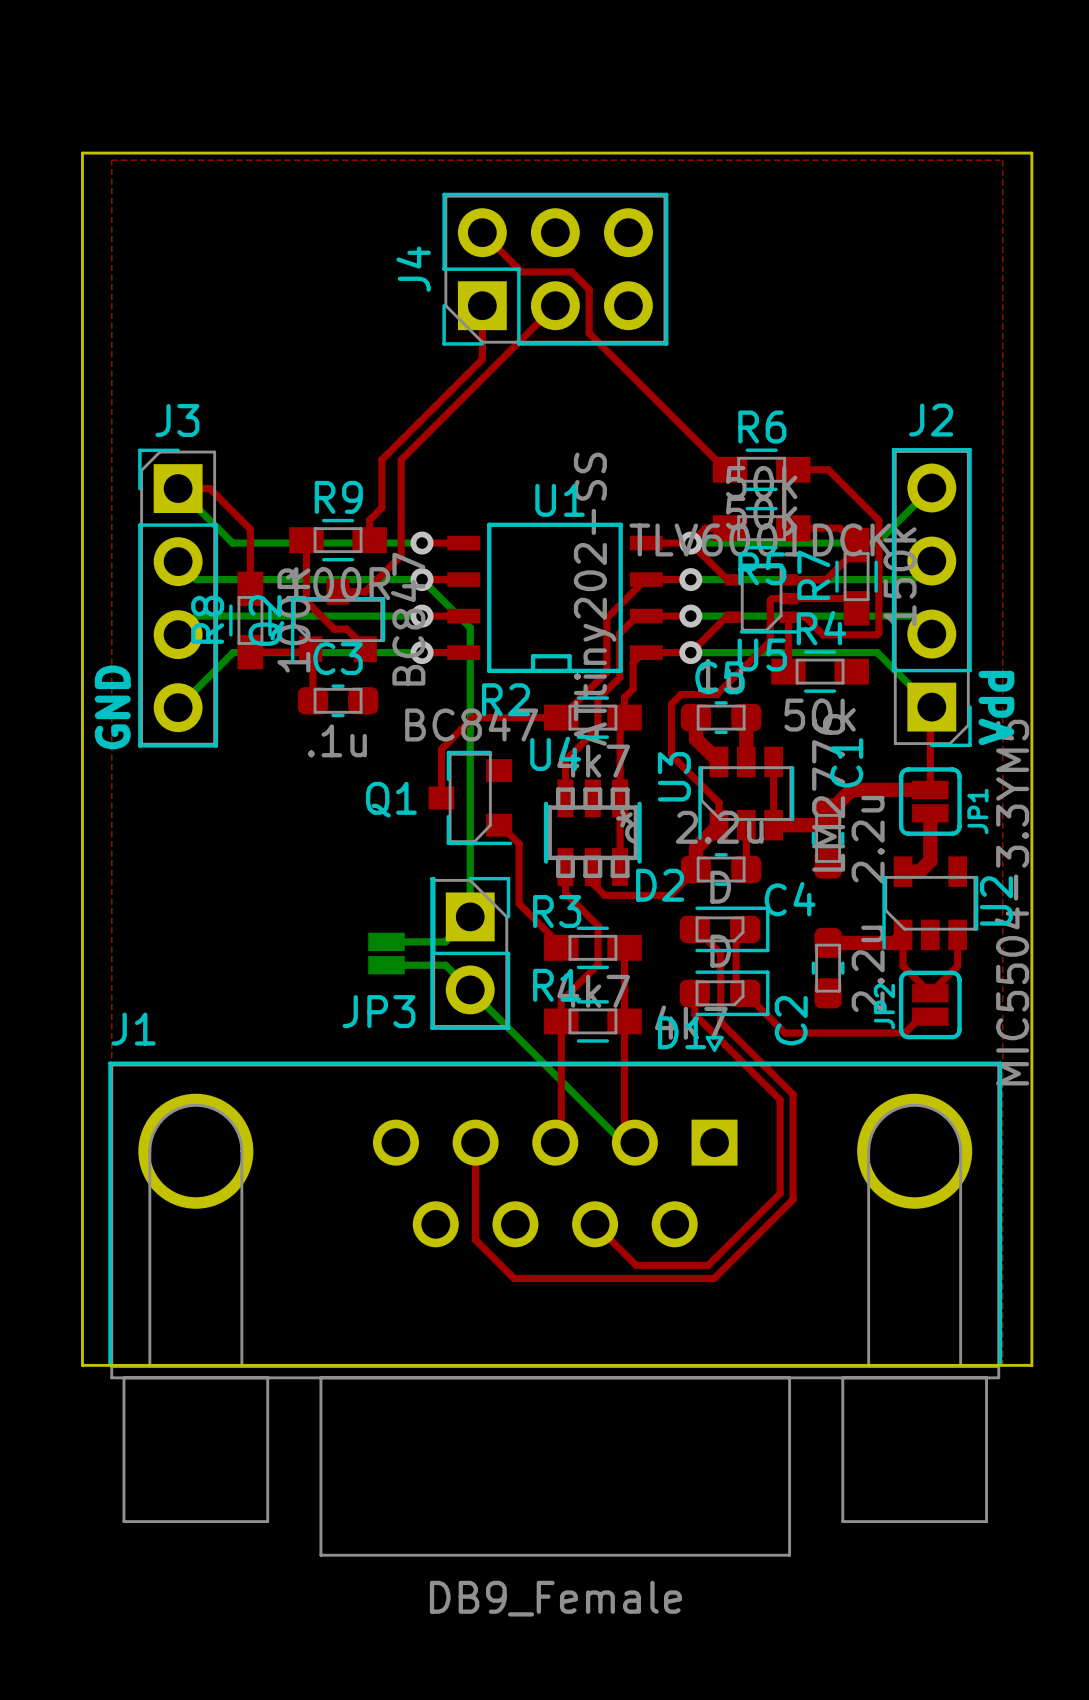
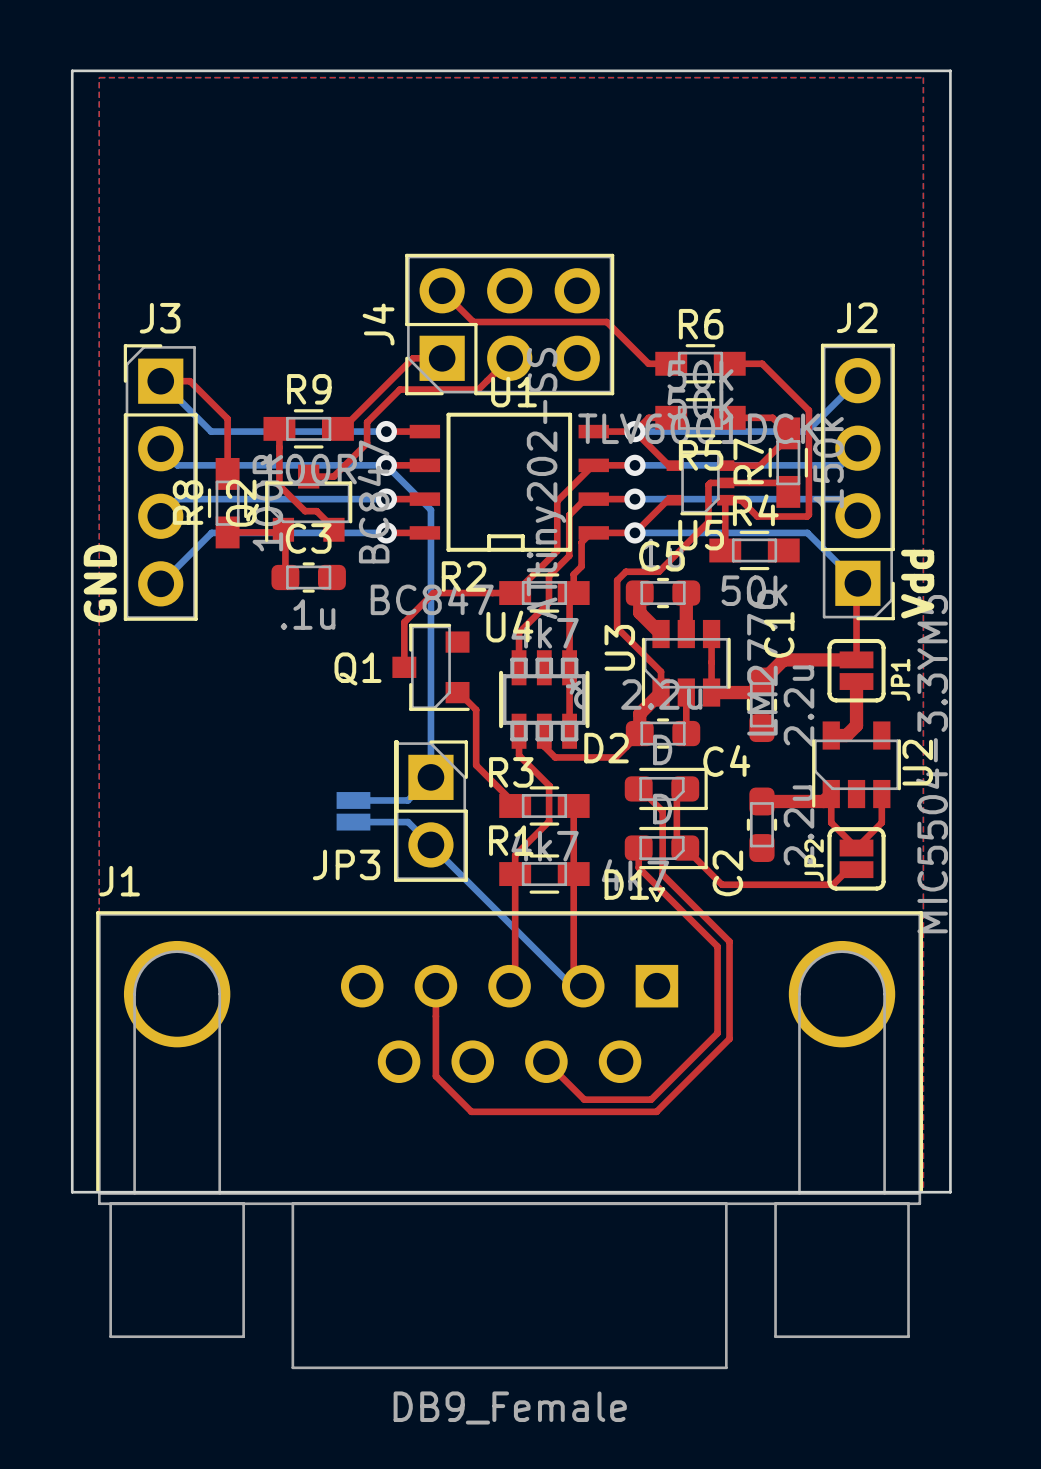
top track: (482, 232) (521, 271) (571, 271) (589, 289) (589, 333) (725, 469) -> (442, 290) (473, 322) (606, 322) (648, 363) (667, 363)
J4 position: (555, 269) -> (509, 324)
top track: (482, 305) (482, 359) (381, 459) (381, 507) (369, 520) (369, 540) -> (442, 358) (413, 358) (342, 428) (337, 428)
top track: (555, 305) (401, 459) (401, 533) -> (509, 358) (478, 389) (399, 389) (367, 422)

